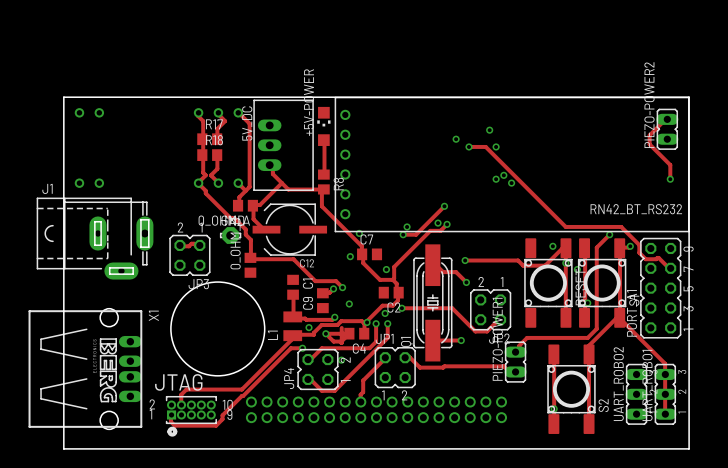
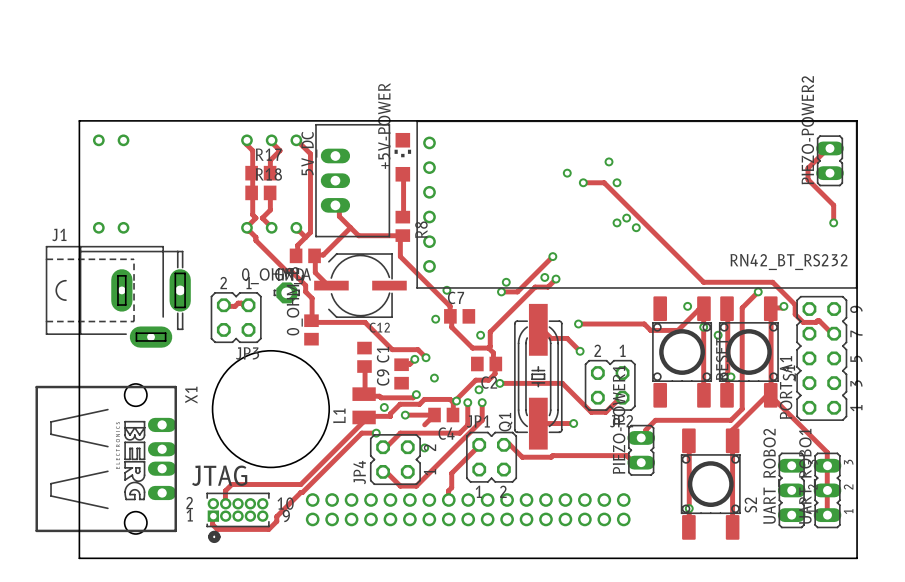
track: (341, 327) (341, 343) (341, 341) (333, 341) (328, 336) -> none

